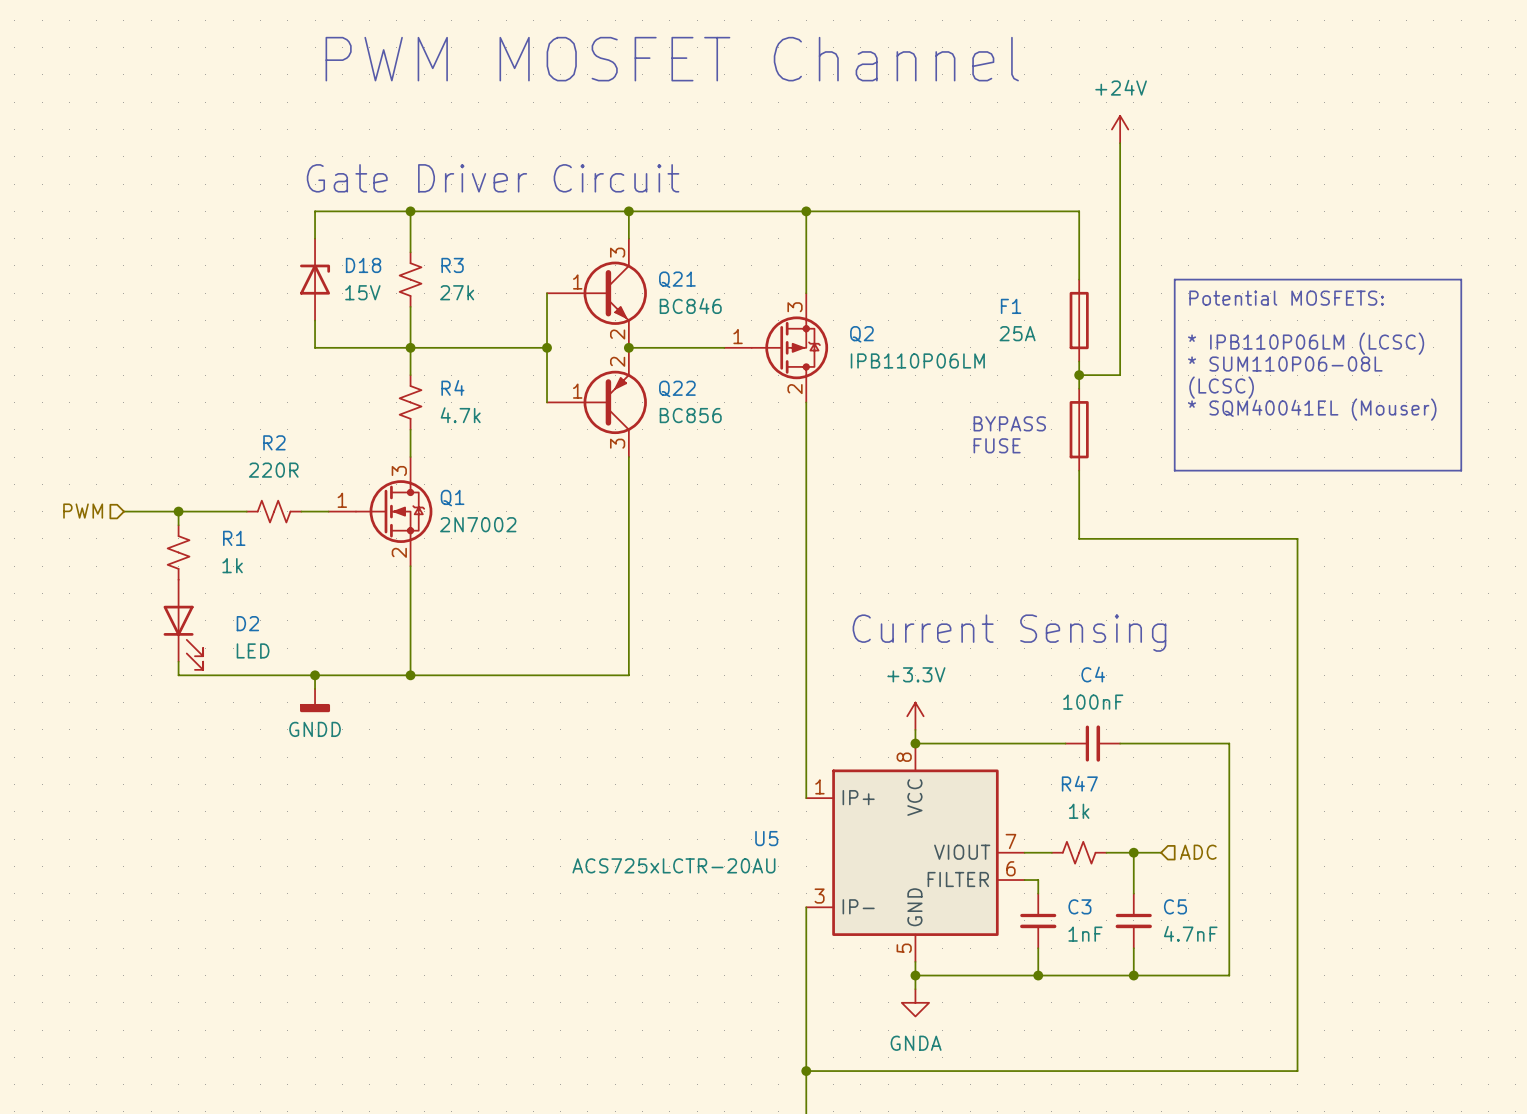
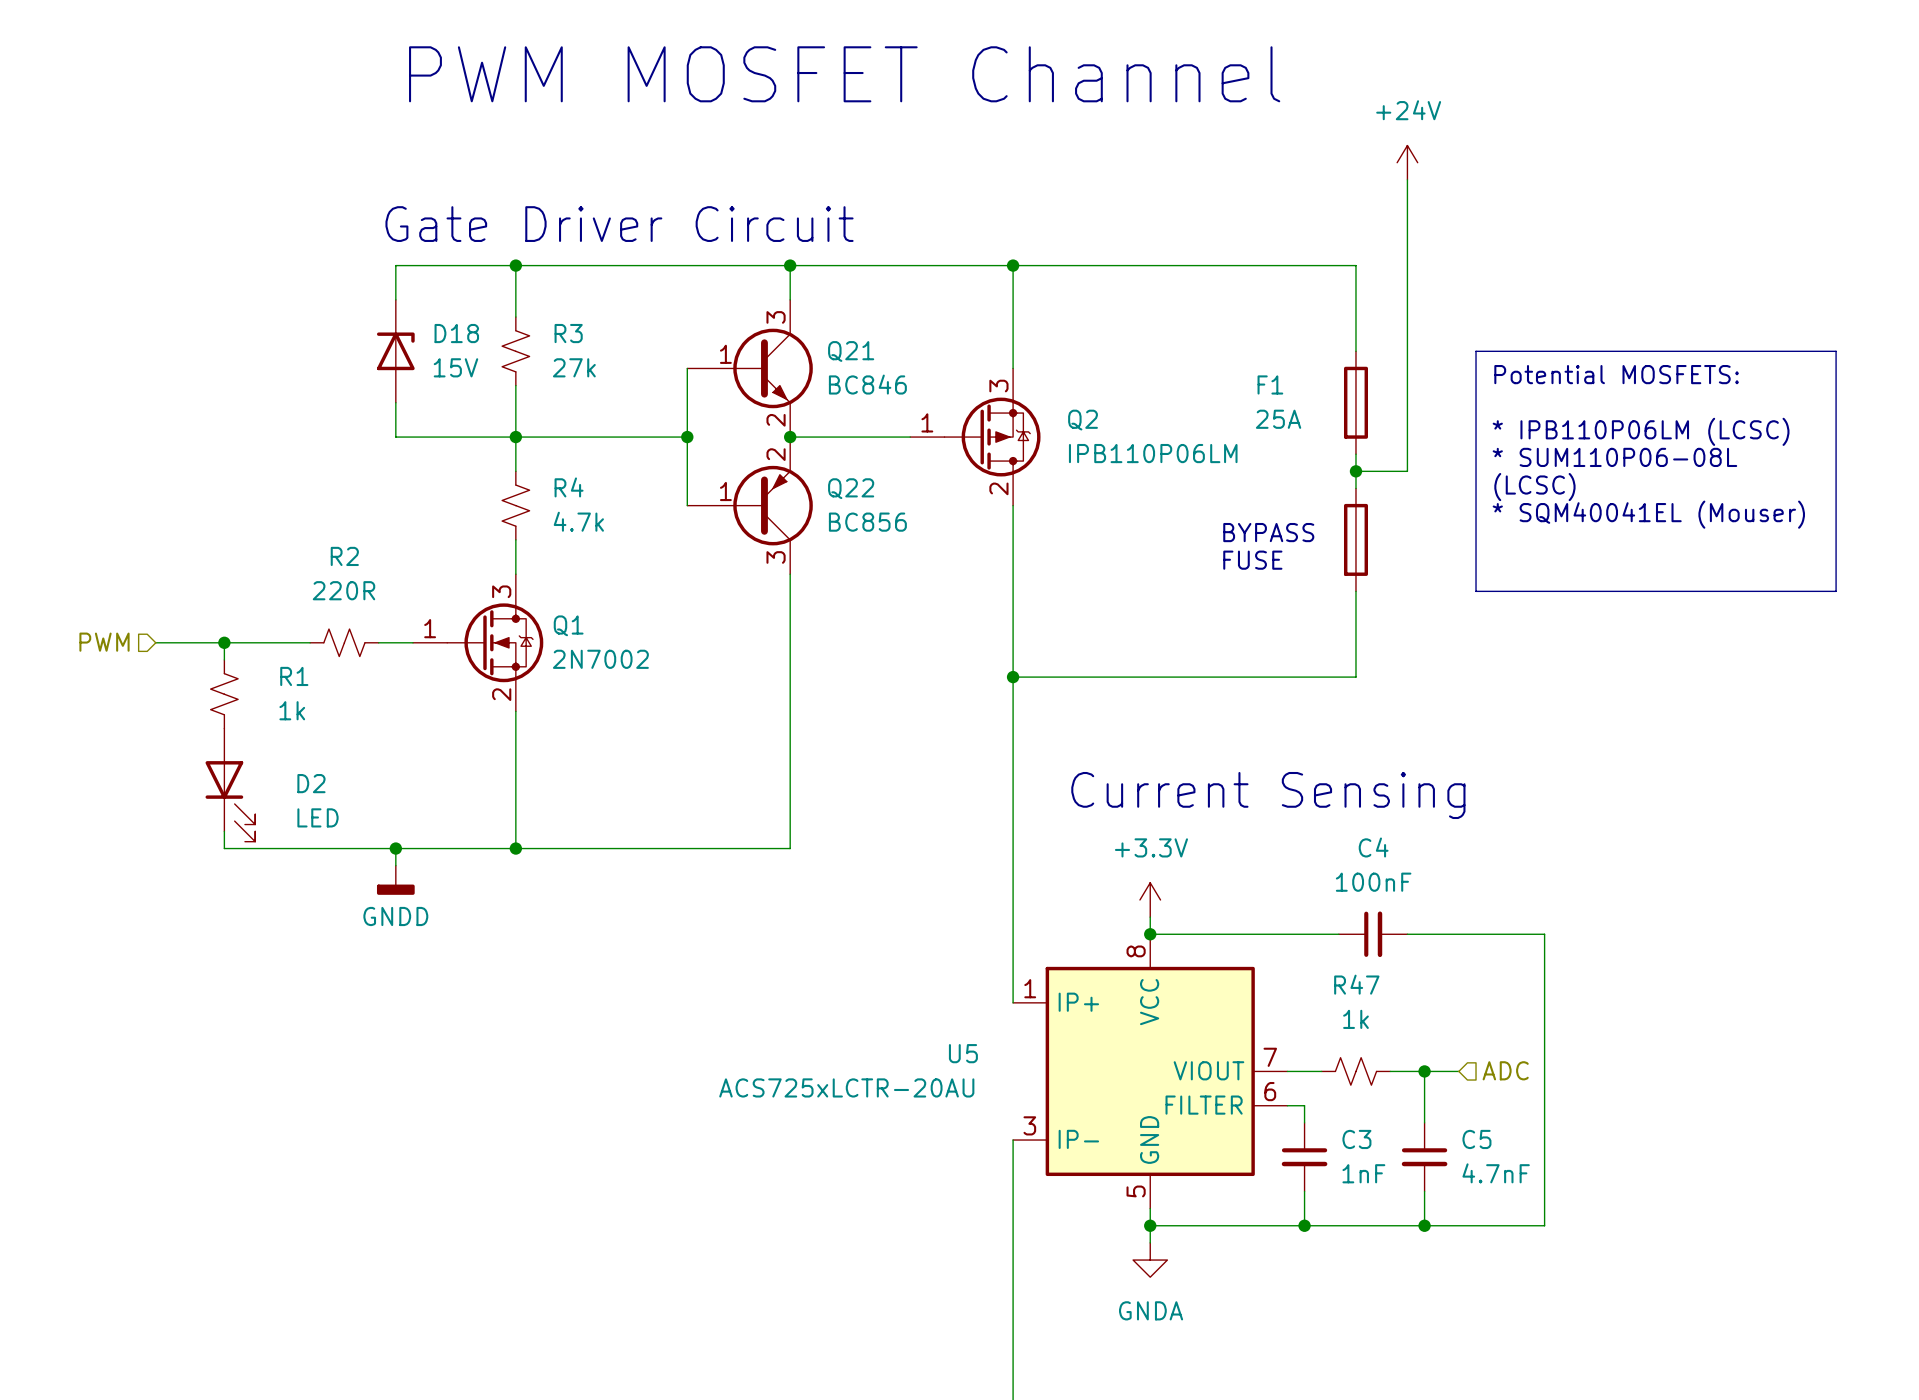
junction: none -> (1013, 677)
wire: (1079, 538) (1297, 538) (1297, 1071) (806, 1071) -> (1355, 677) (1013, 677)
junction: (806, 1071) -> none

